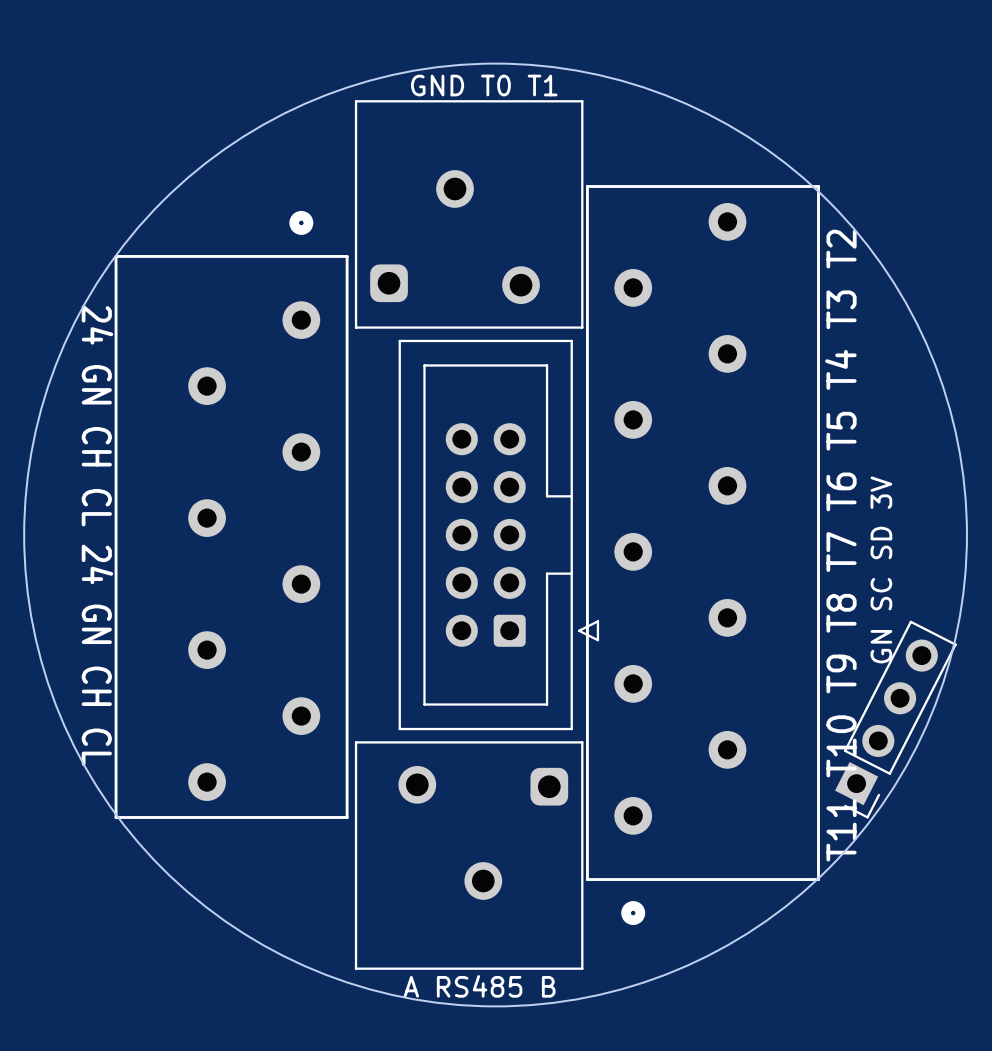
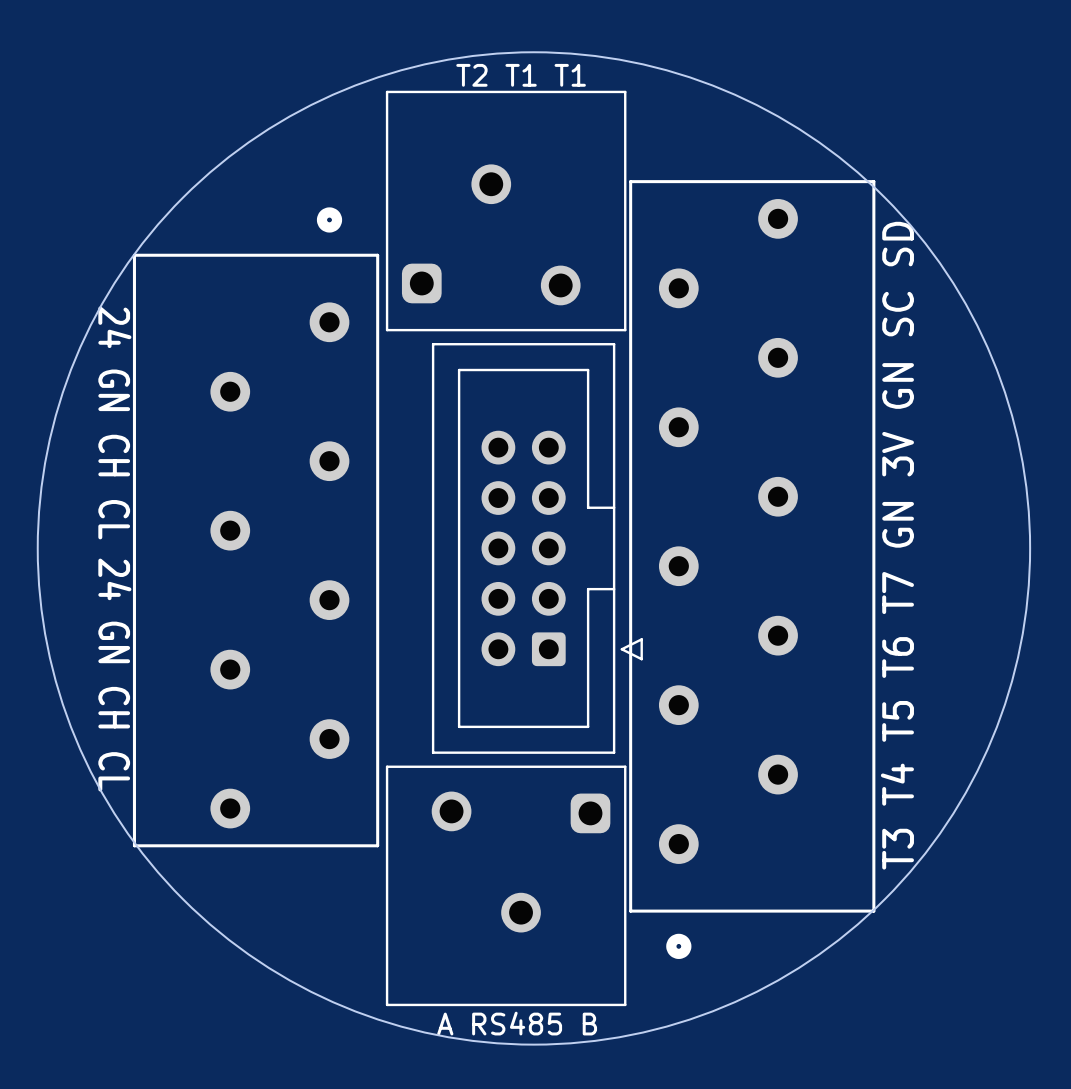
part value: GND T0 T1 (484, 85) -> T2 T1 T1 (521, 75)
part value: T11 T10 T9 T8 T7 T6 T5 T4 T3 T2 (840, 545) -> T3 T4 T5 T6 T7 GN 3V GN SC SD (897, 545)
text: GN SC SD 3V (881, 569) -> none
part: (895, 719) -> none

